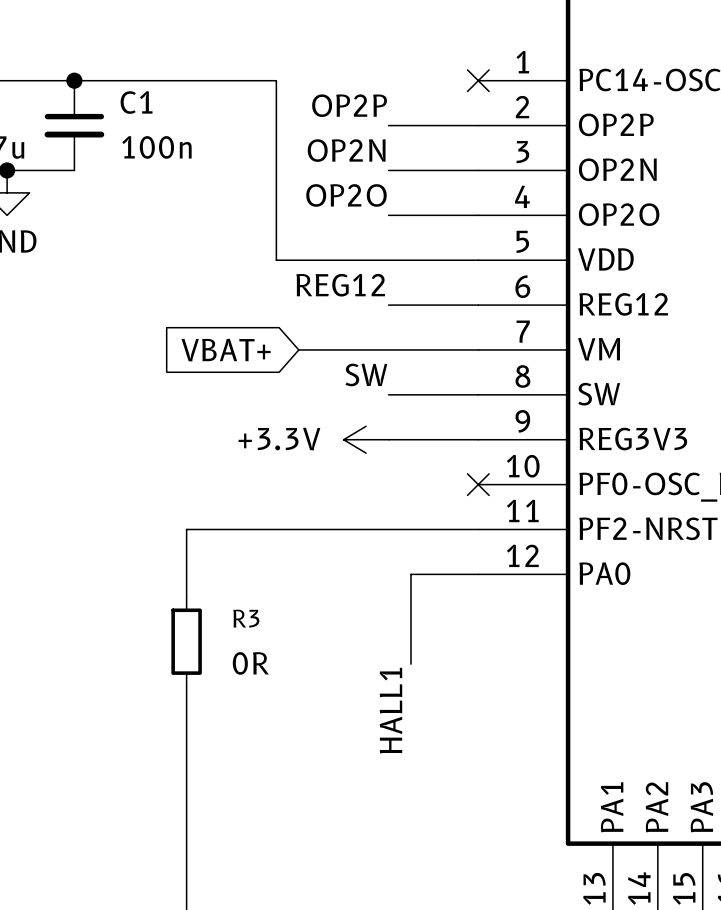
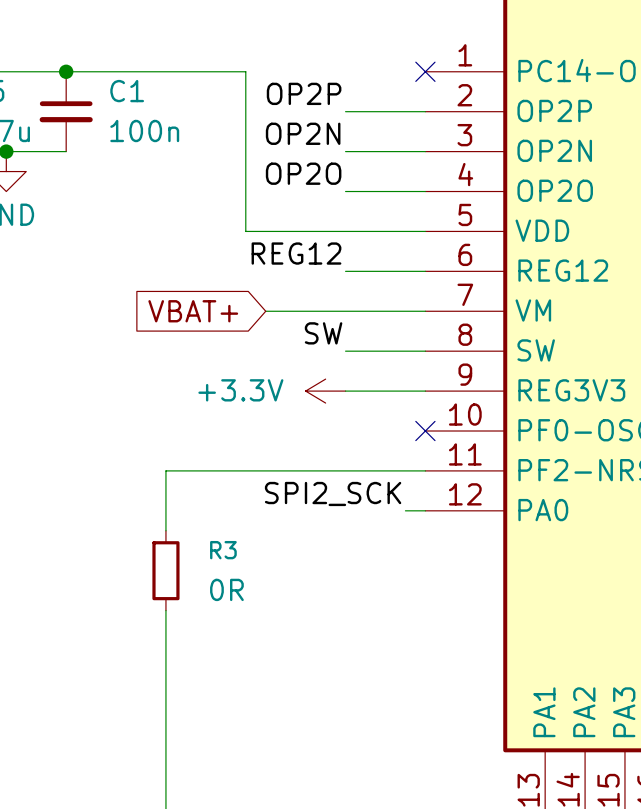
label: none -> SPI2_SCK (333, 493)
wire: (455, 574) (411, 574) (411, 664) -> none
label: HALL1 (390, 710) -> none

